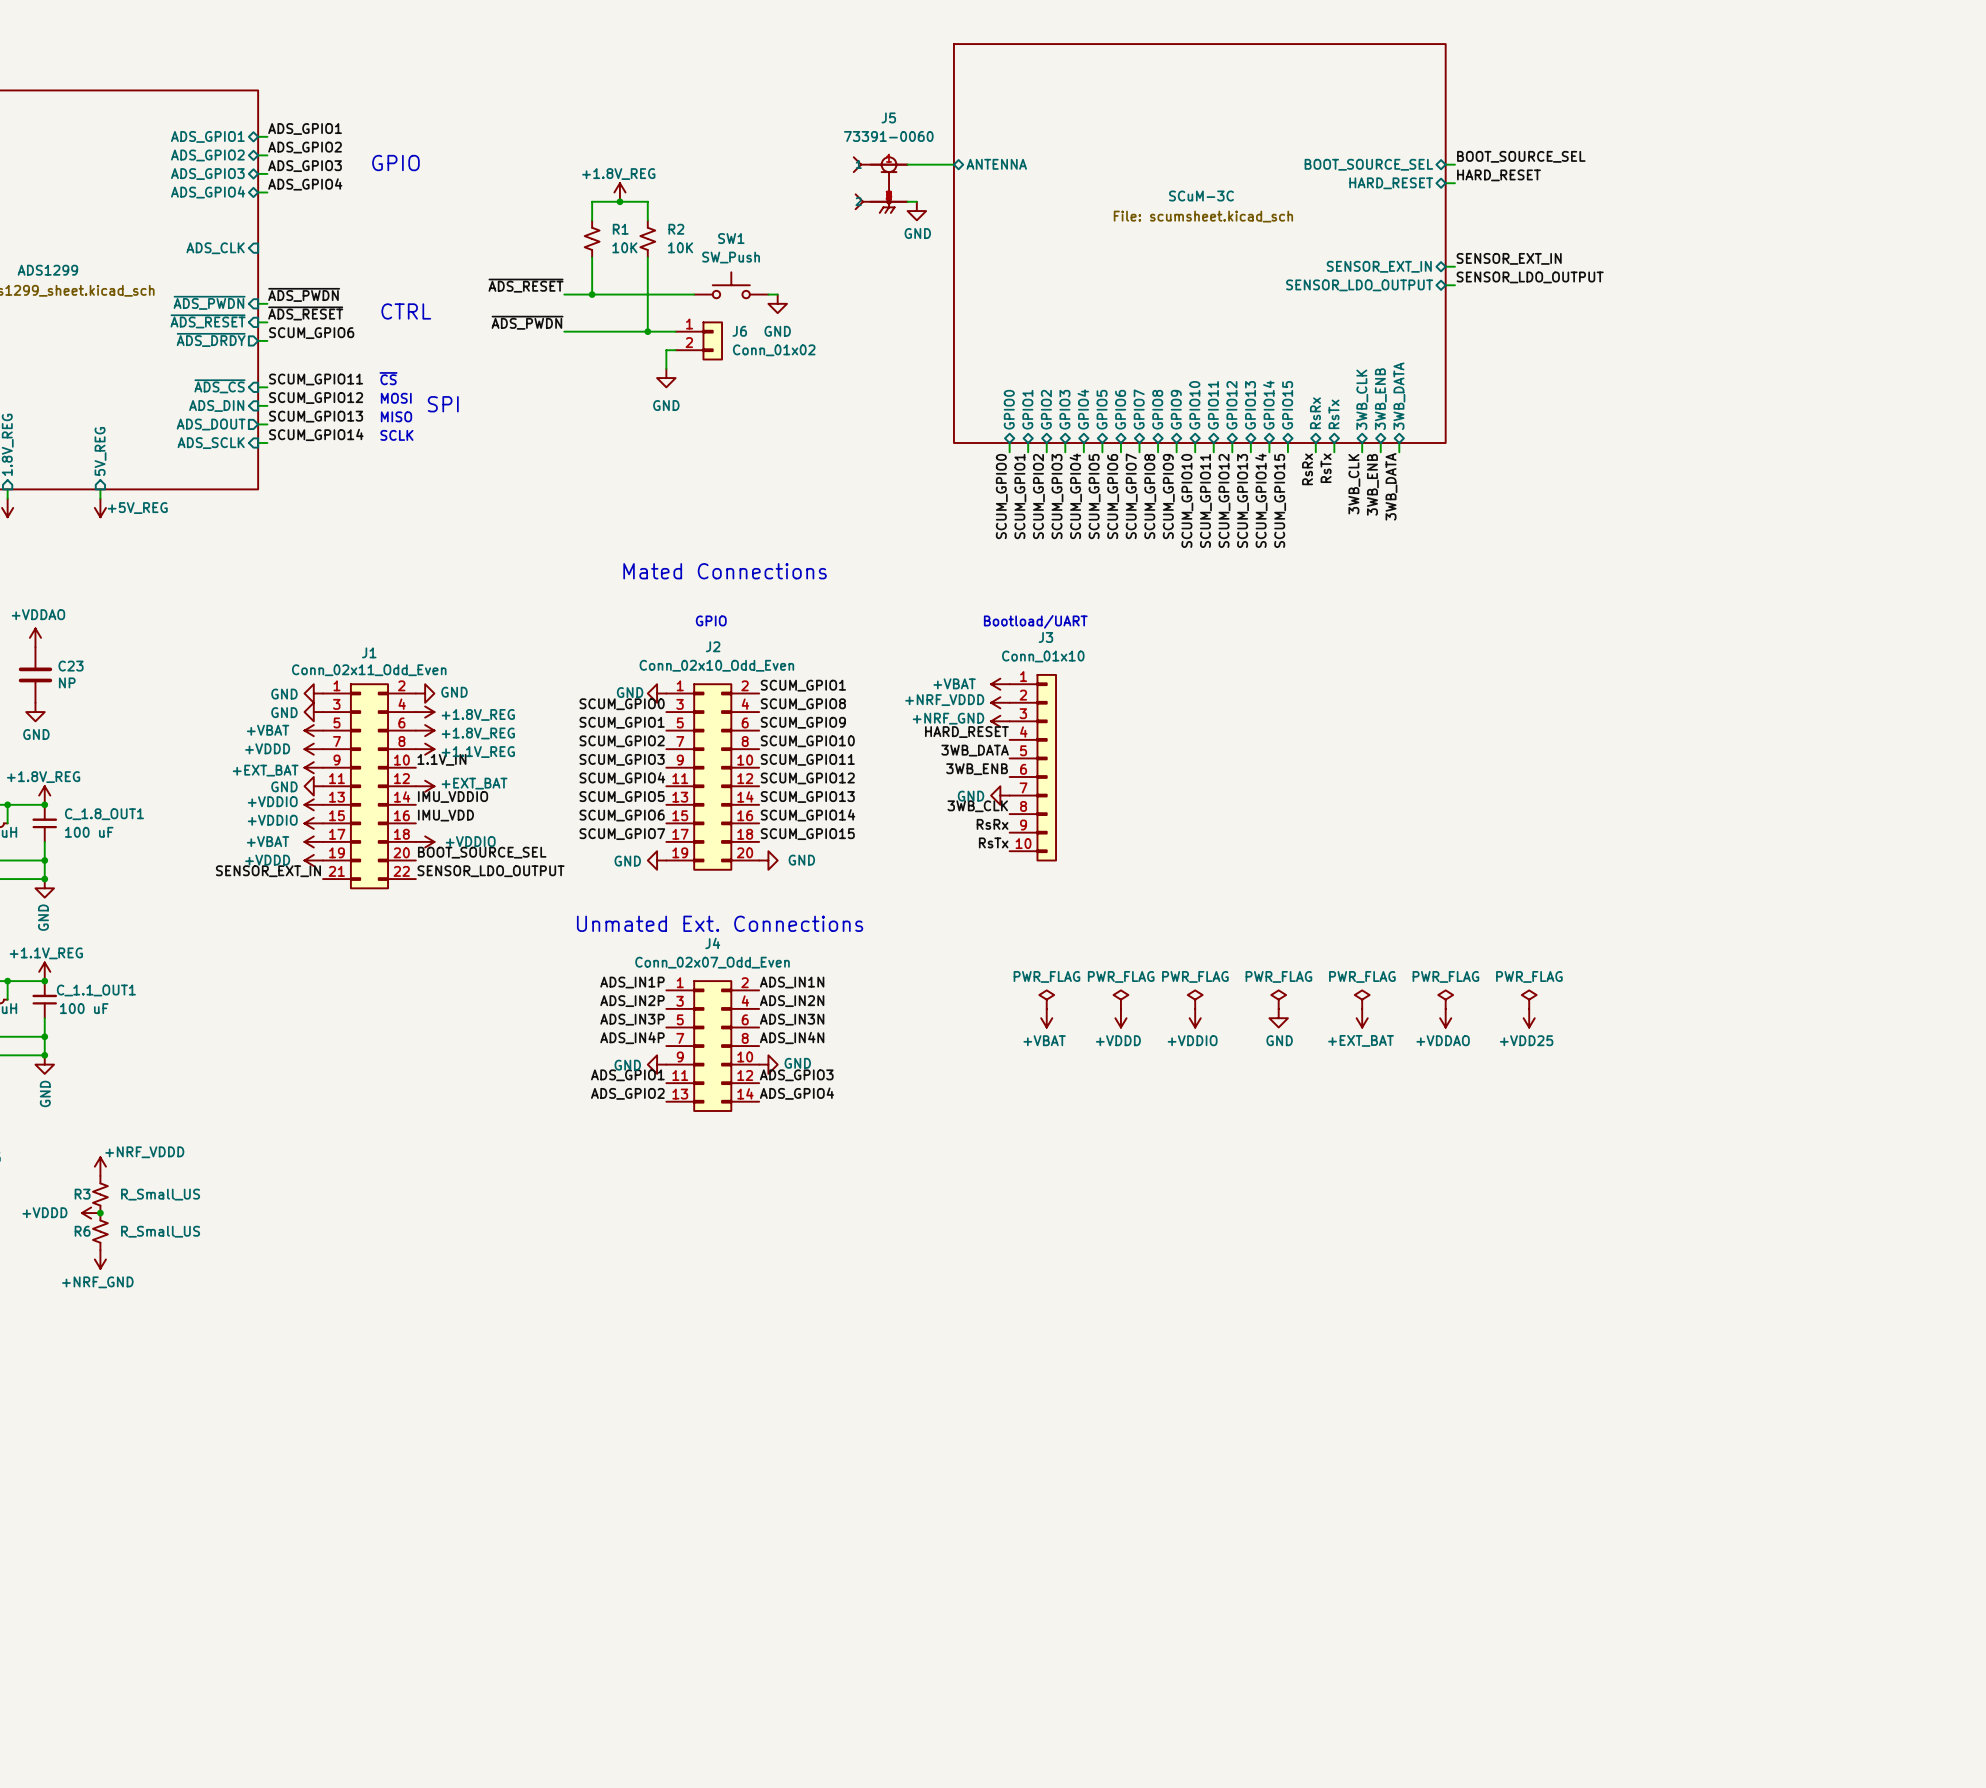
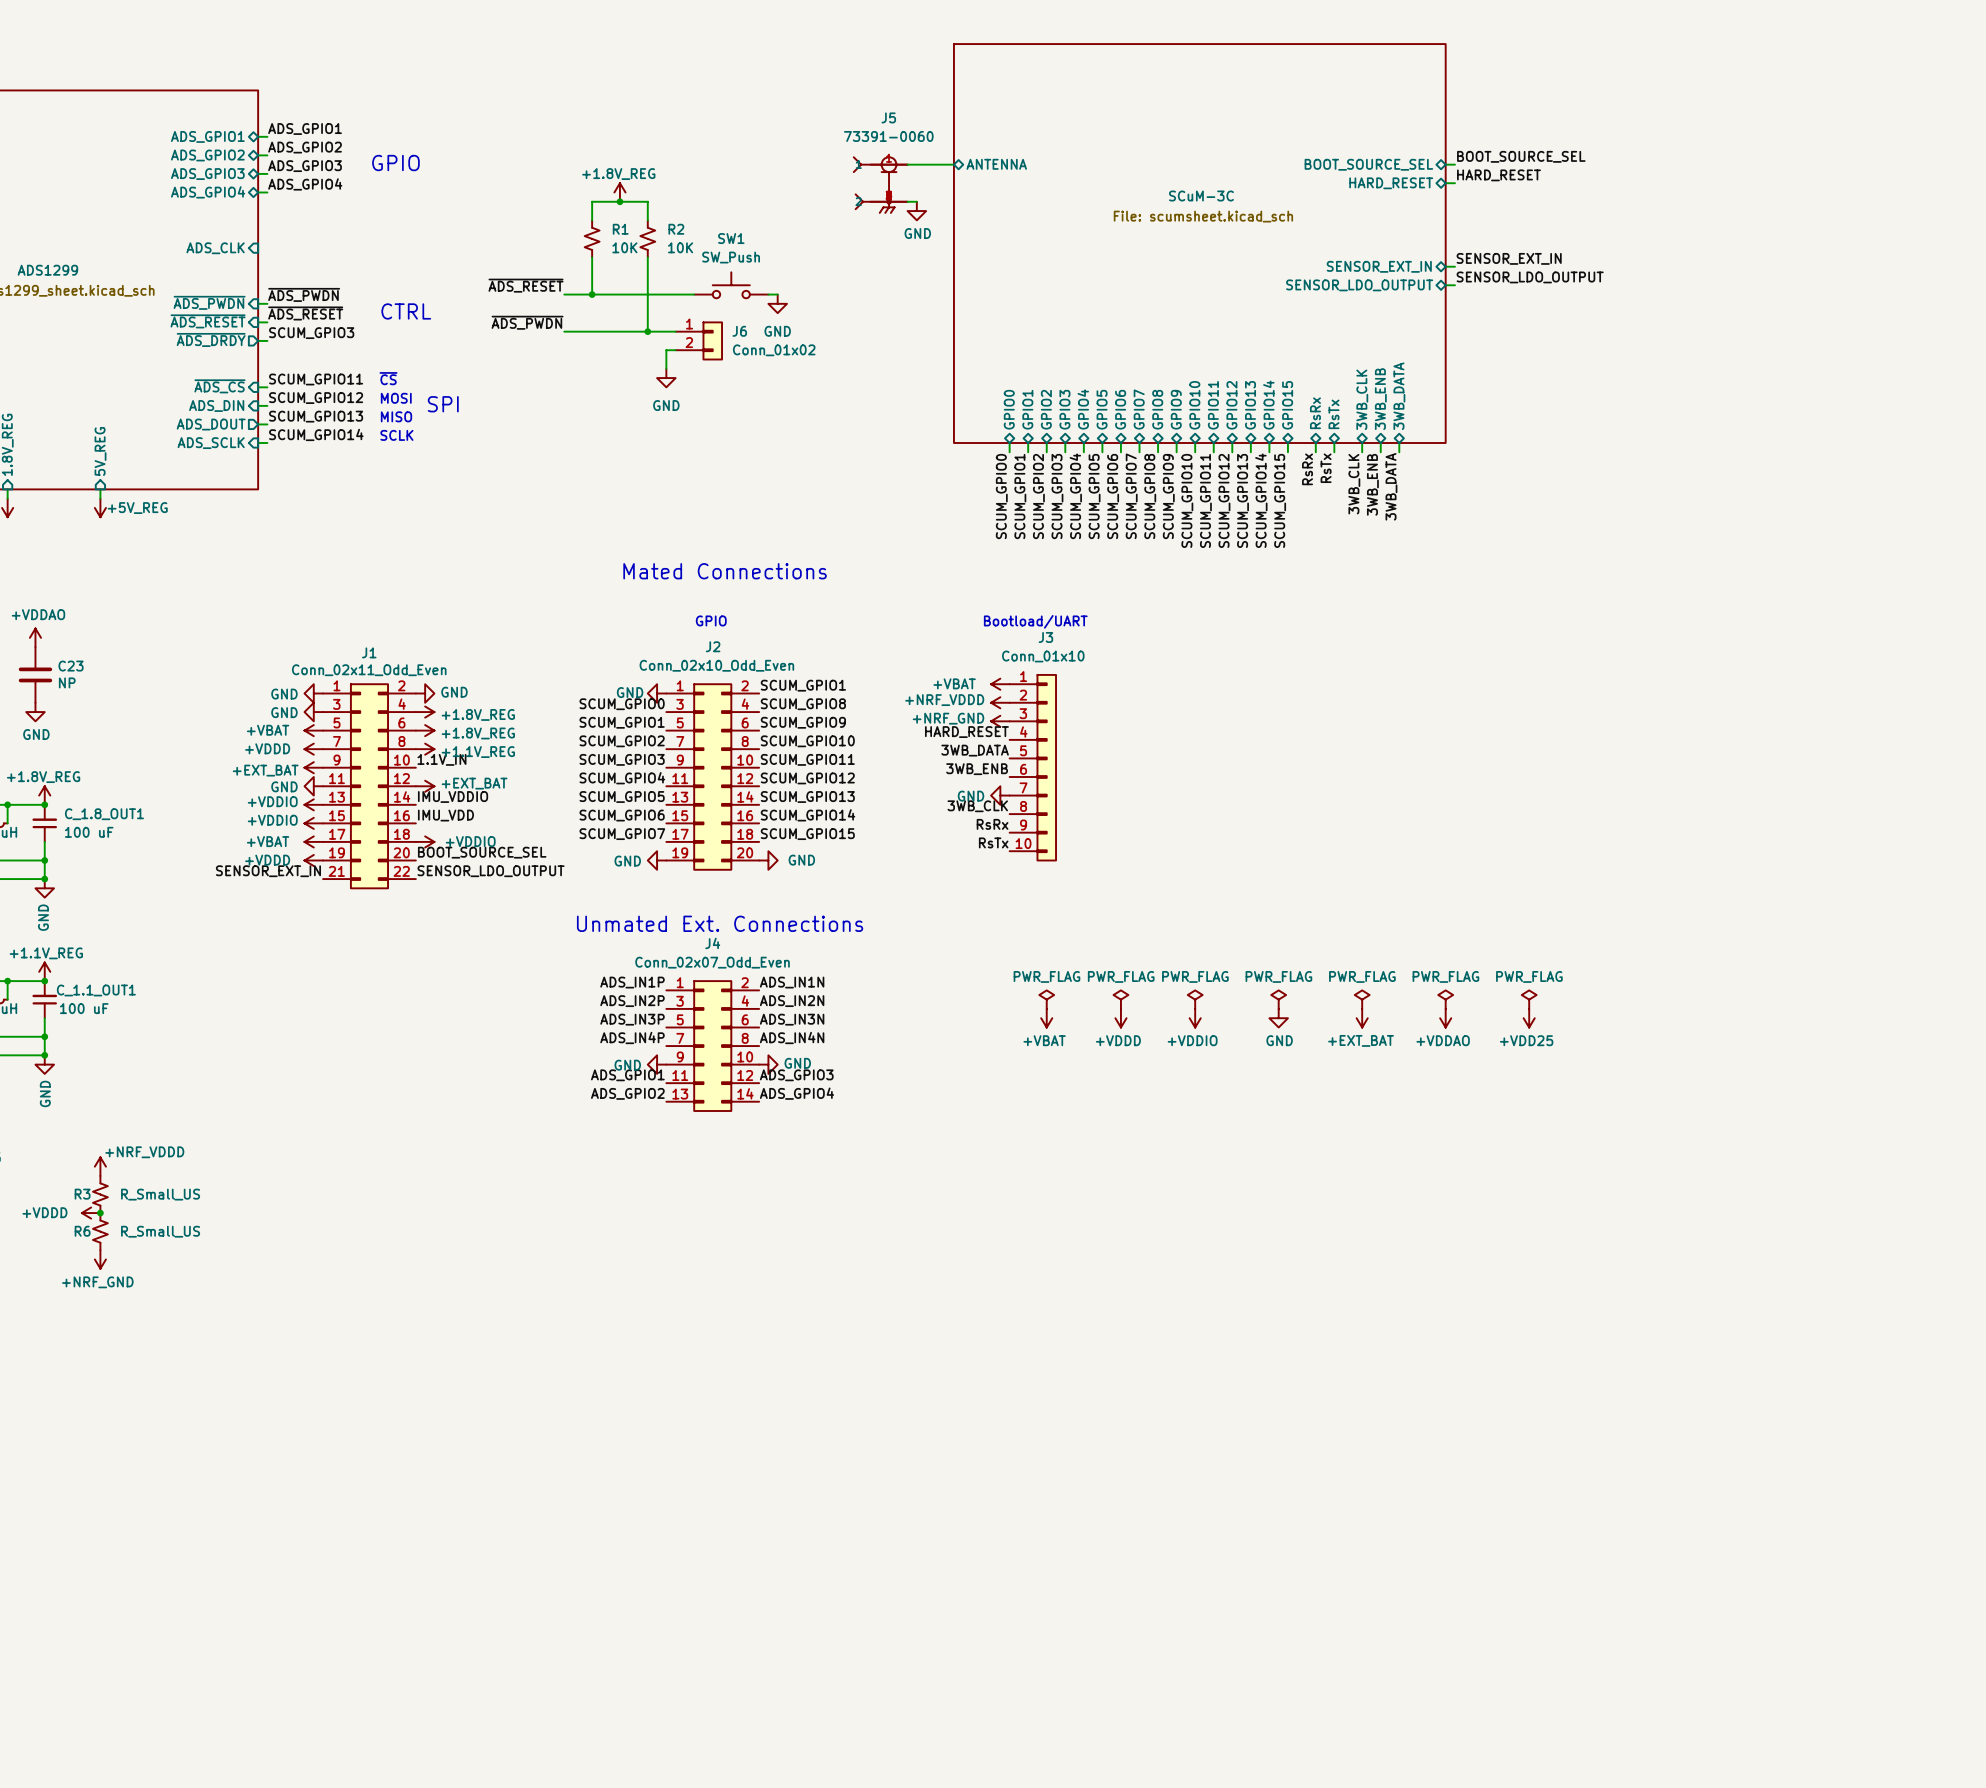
label: SCUM_GPIO6 (311, 333) -> SCUM_GPIO3 (311, 333)

